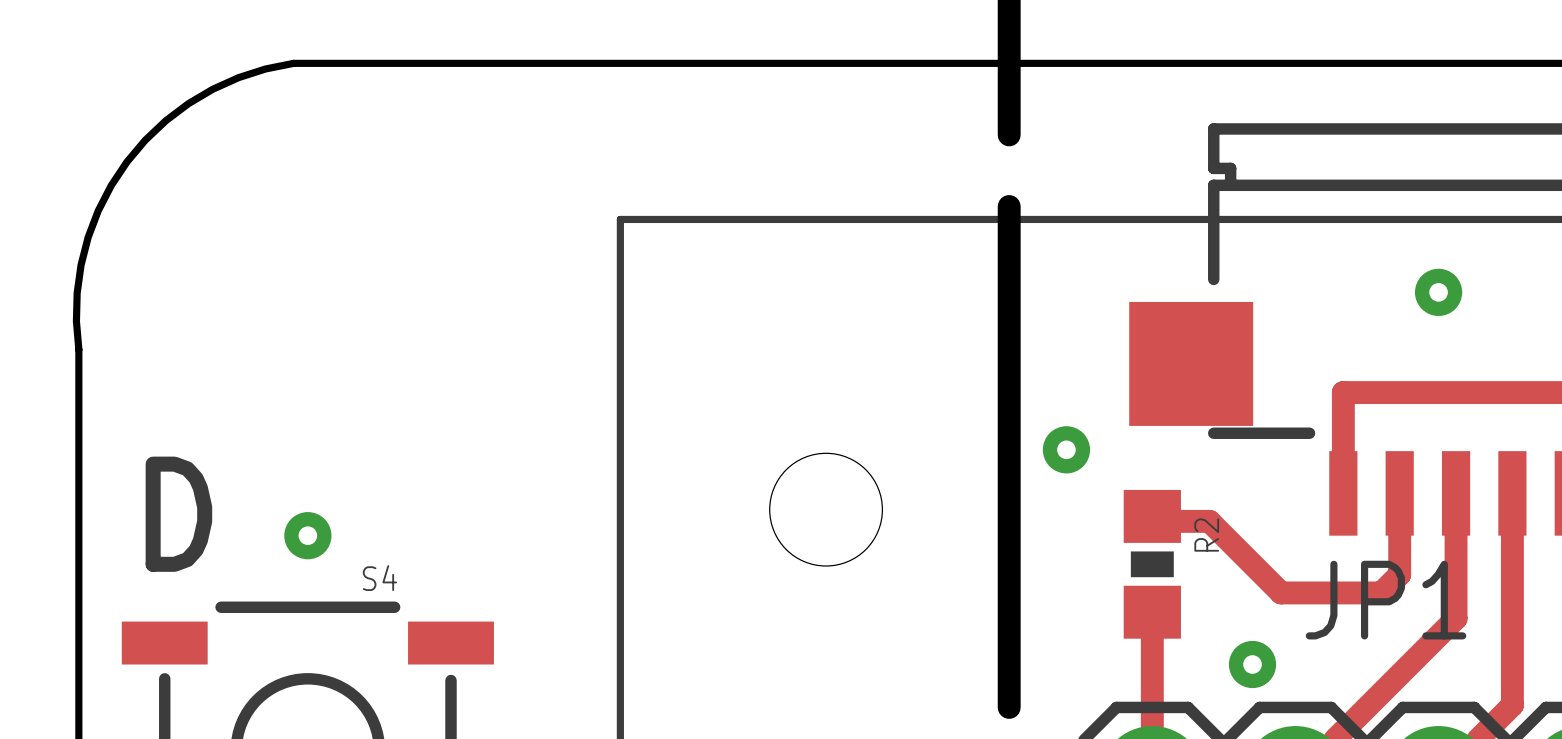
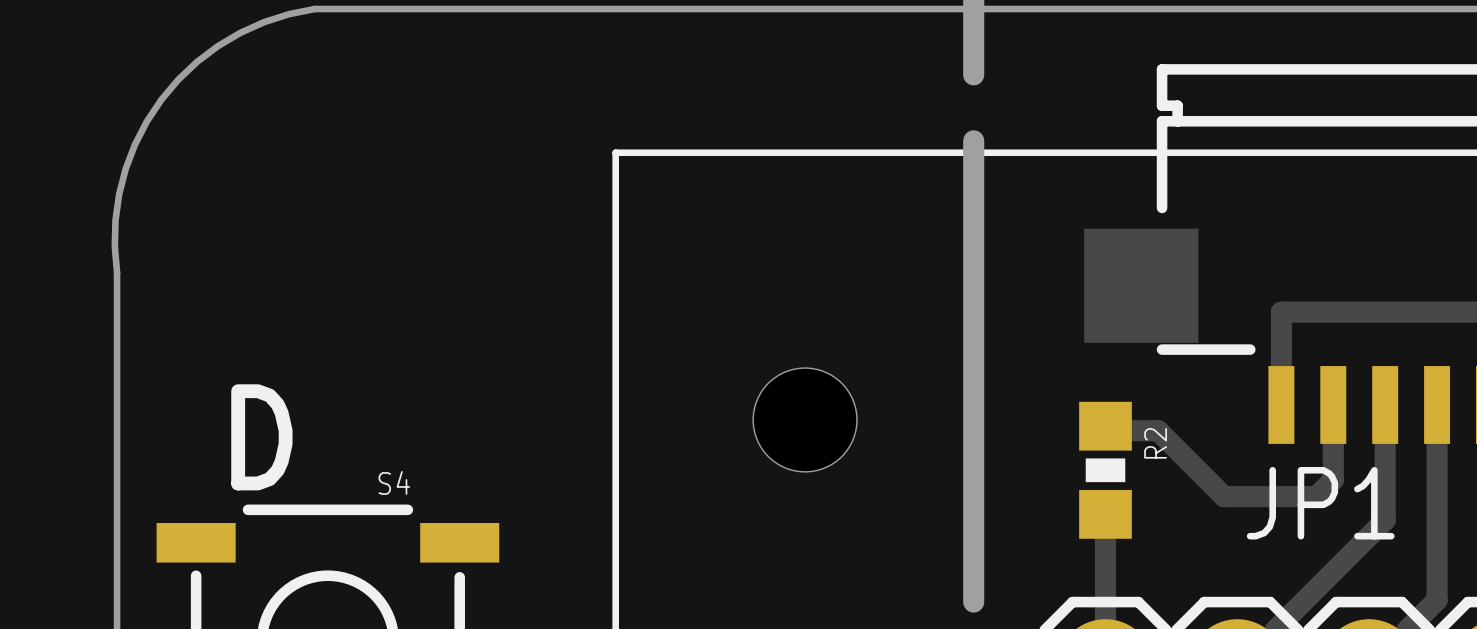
via: (1438, 292) -> none
via: (1066, 449) -> none
text position: D (178, 514) -> D (261, 437)
via: (307, 535) -> none
via: (1252, 664) -> none

